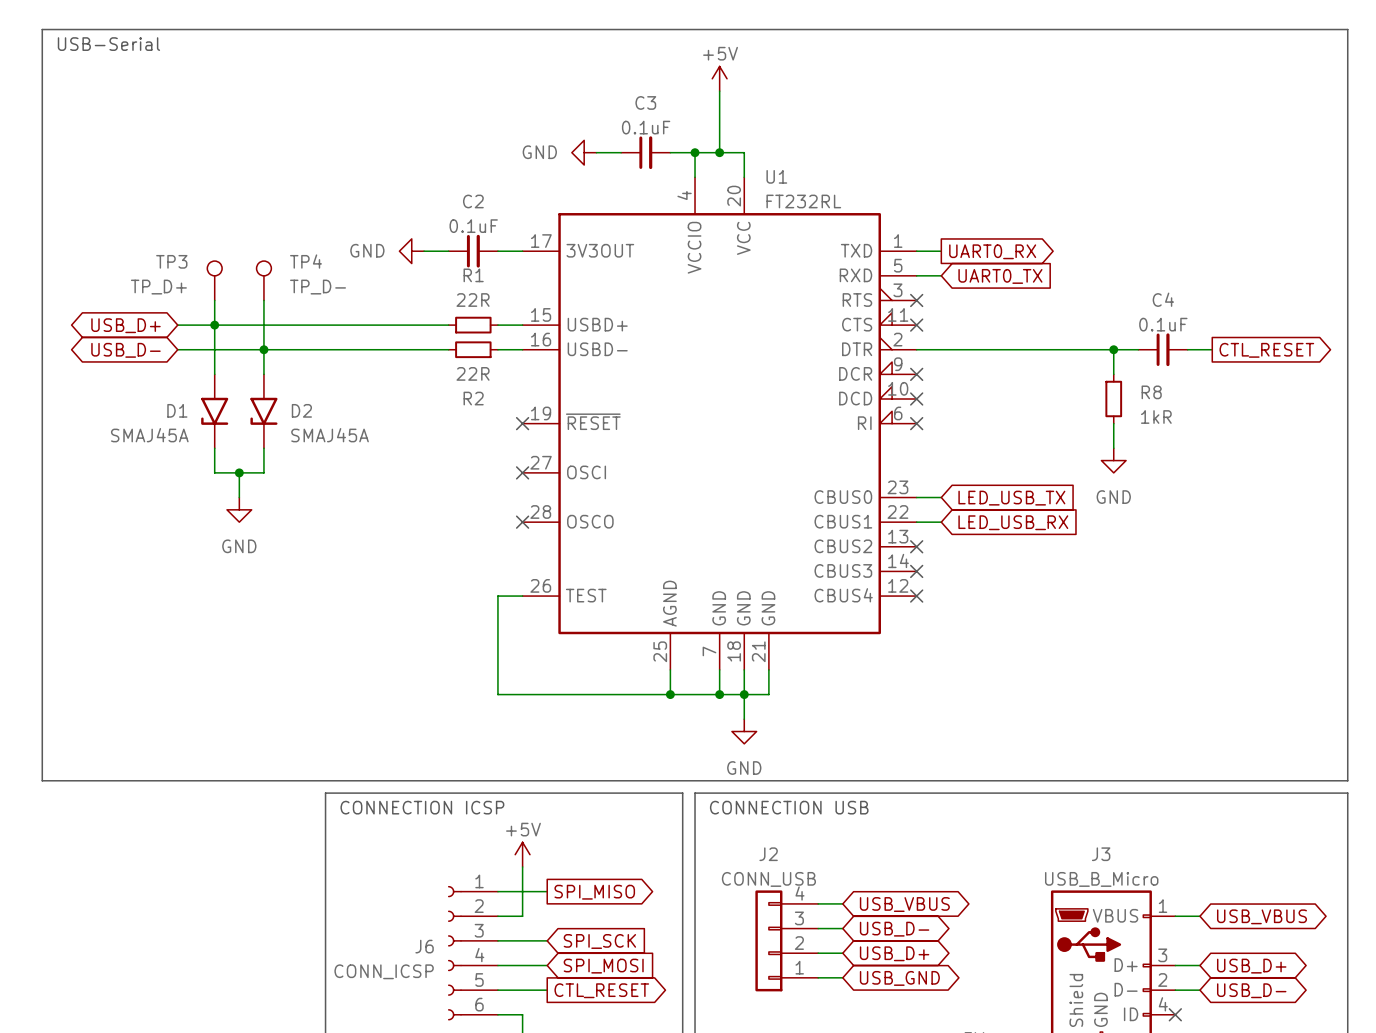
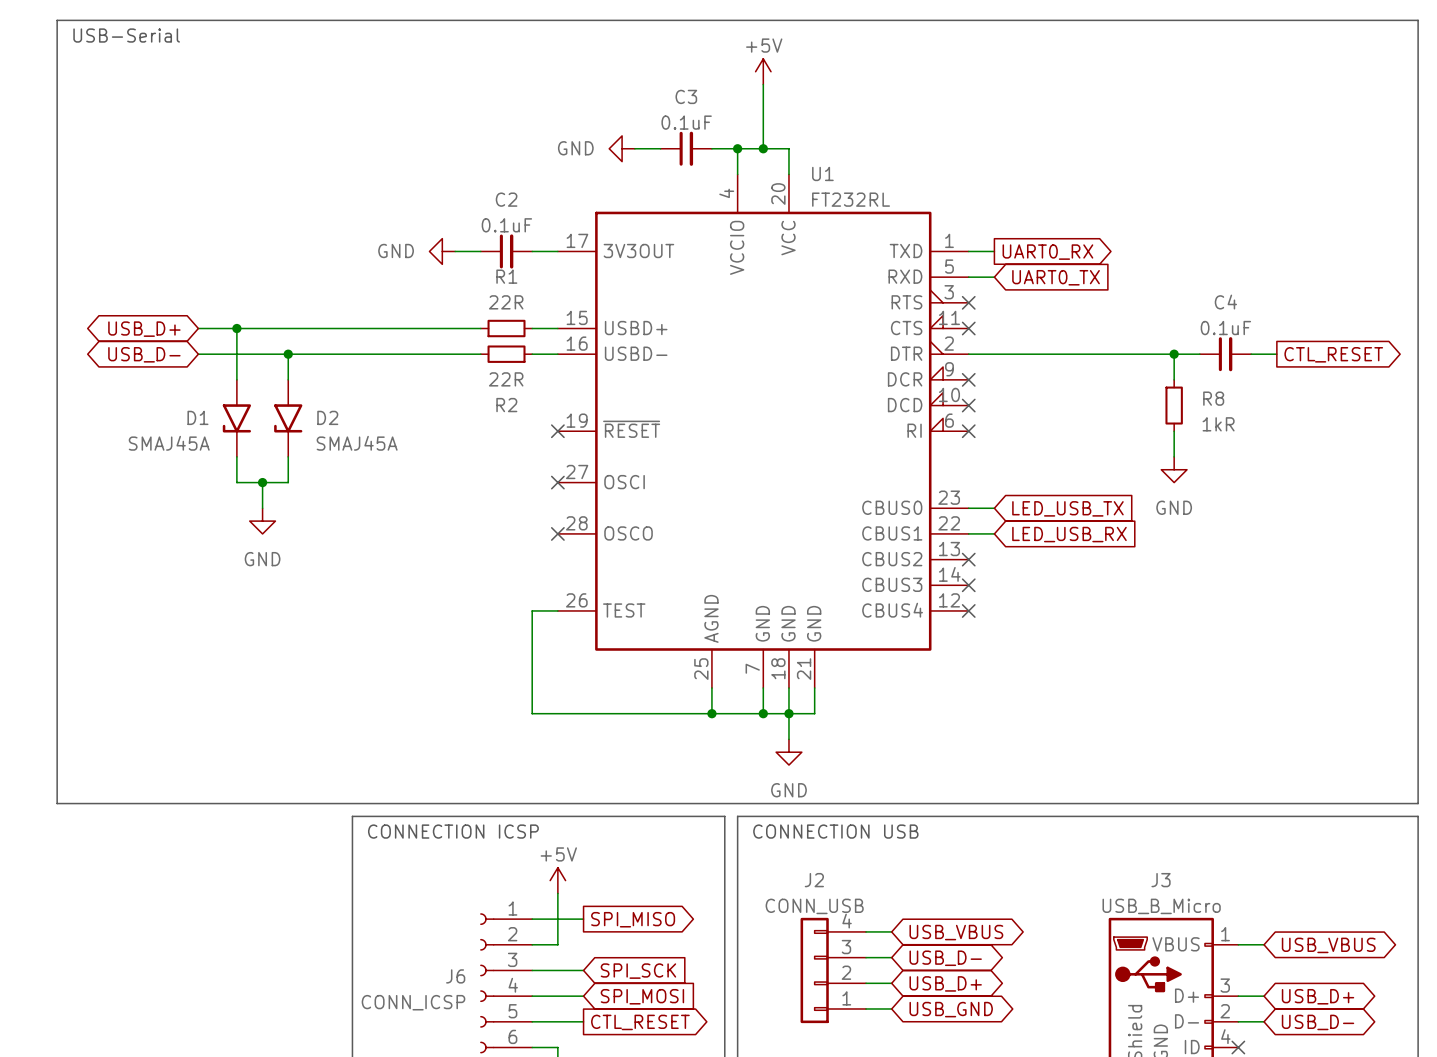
TP3: TP_D+ (214, 280) -> none
TP4: TP_D- (263, 280) -> none
wire: (214, 300) (214, 325) -> none
wire: (263, 300) (263, 349) -> none

